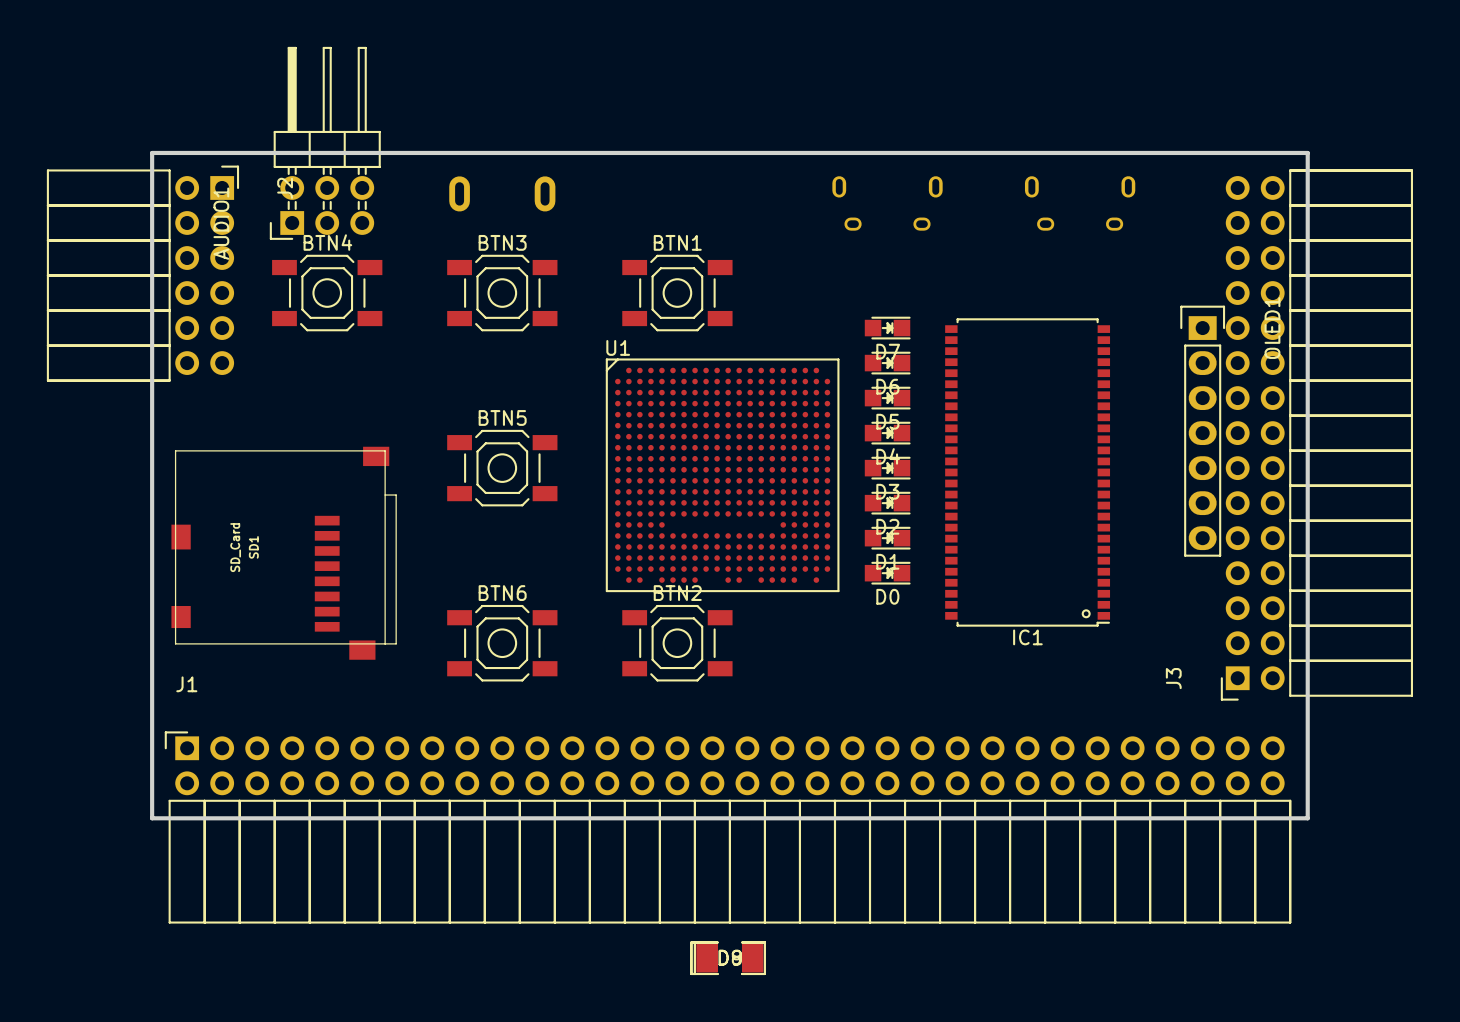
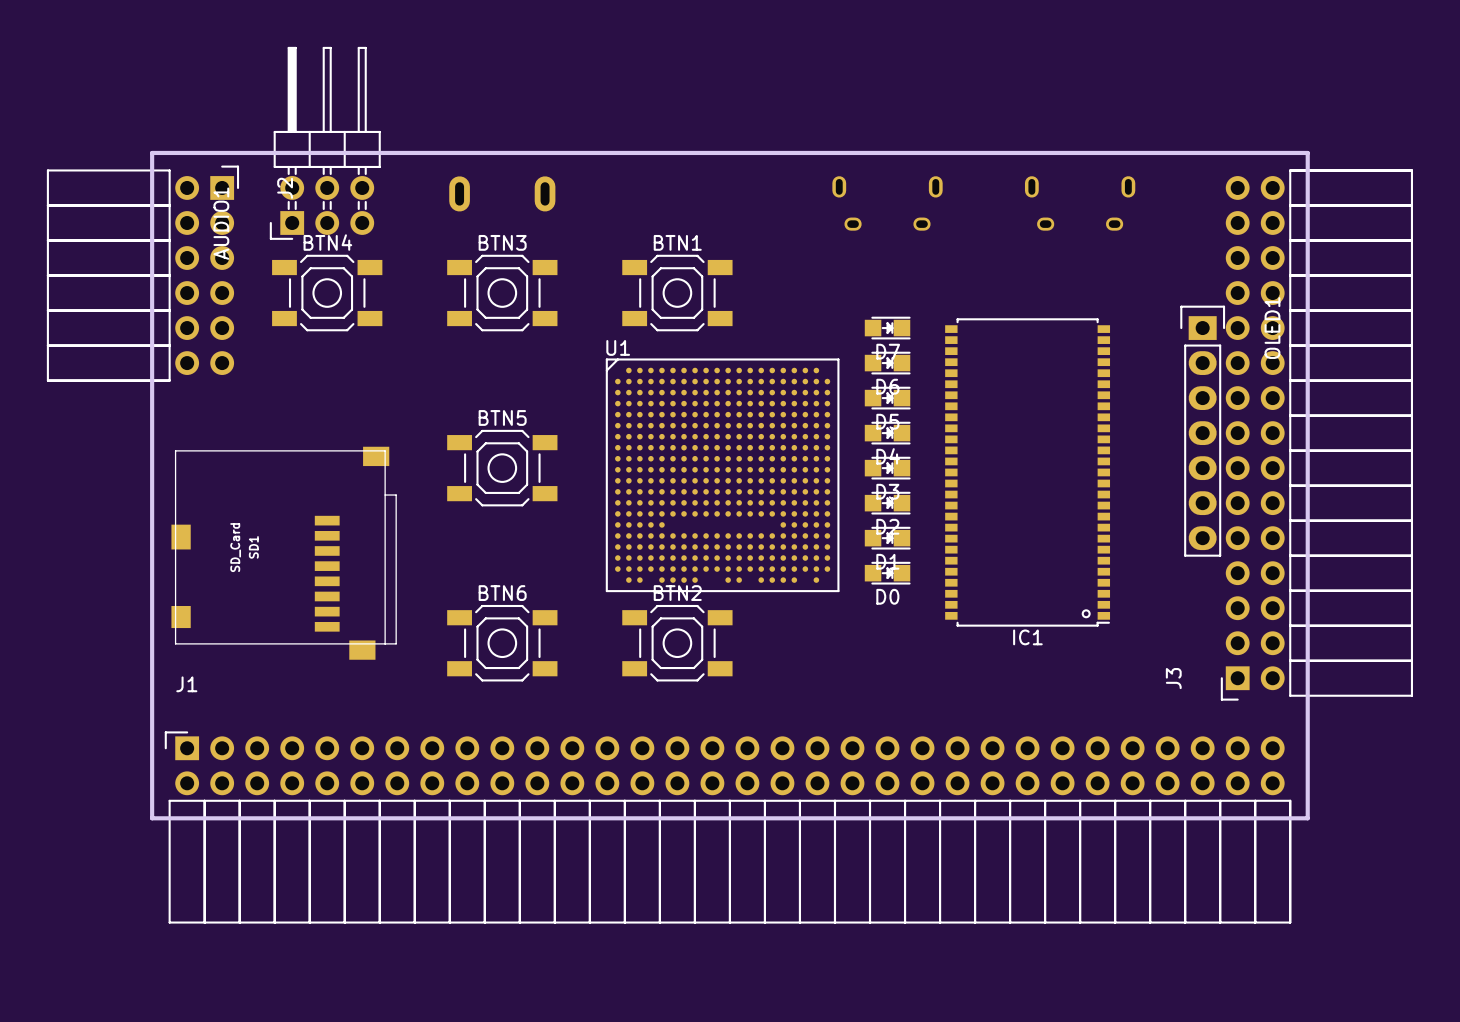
part: (728, 958) -> none
part: (728, 958) -> none

